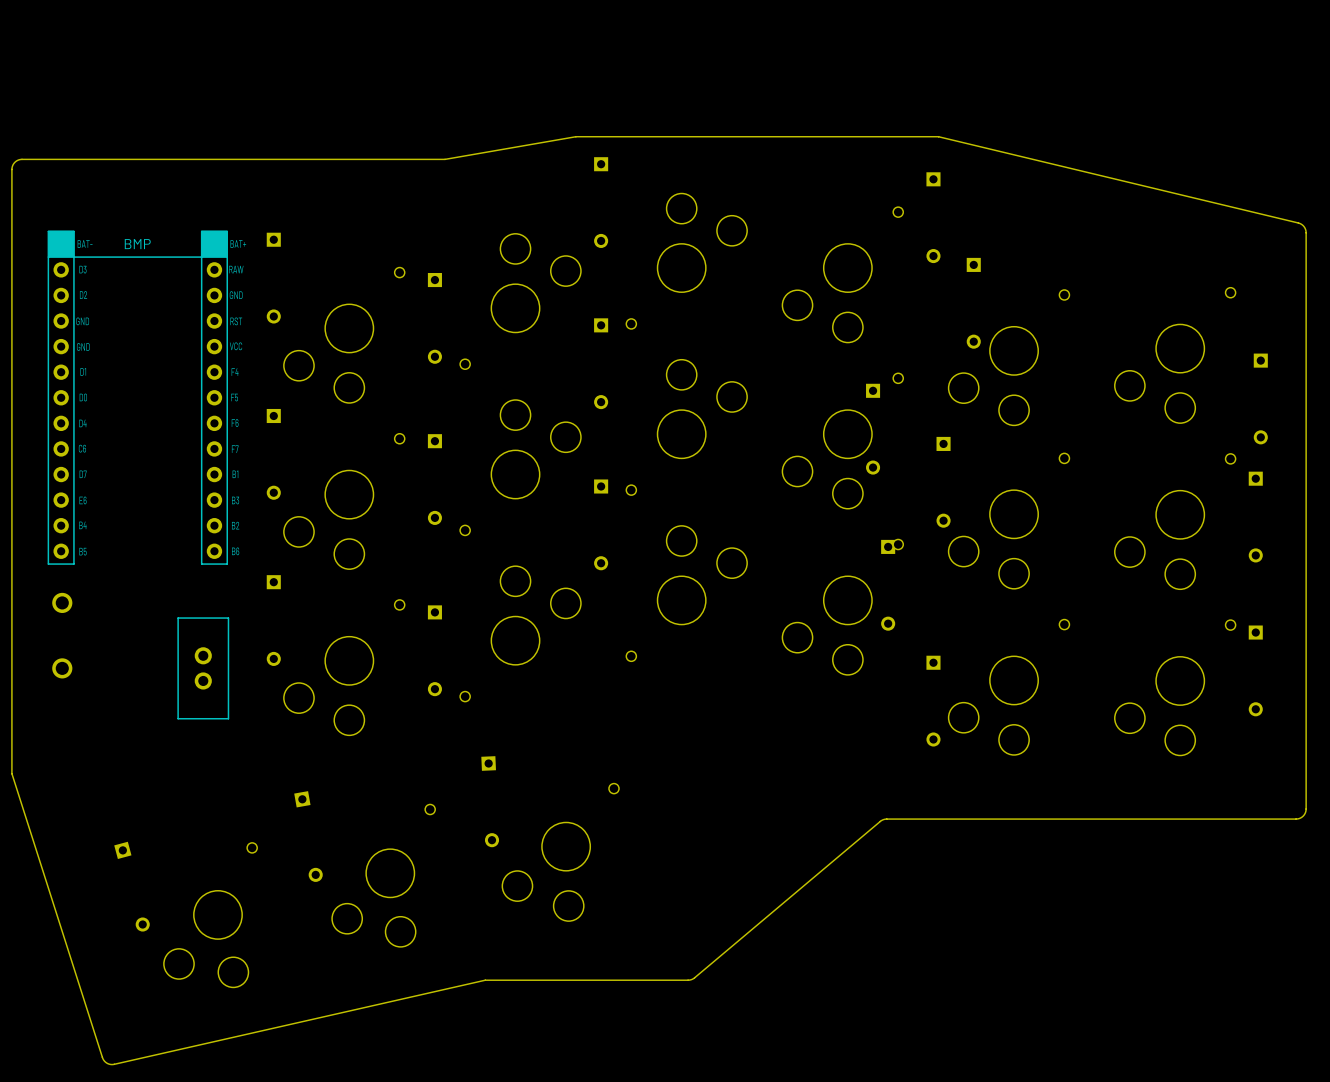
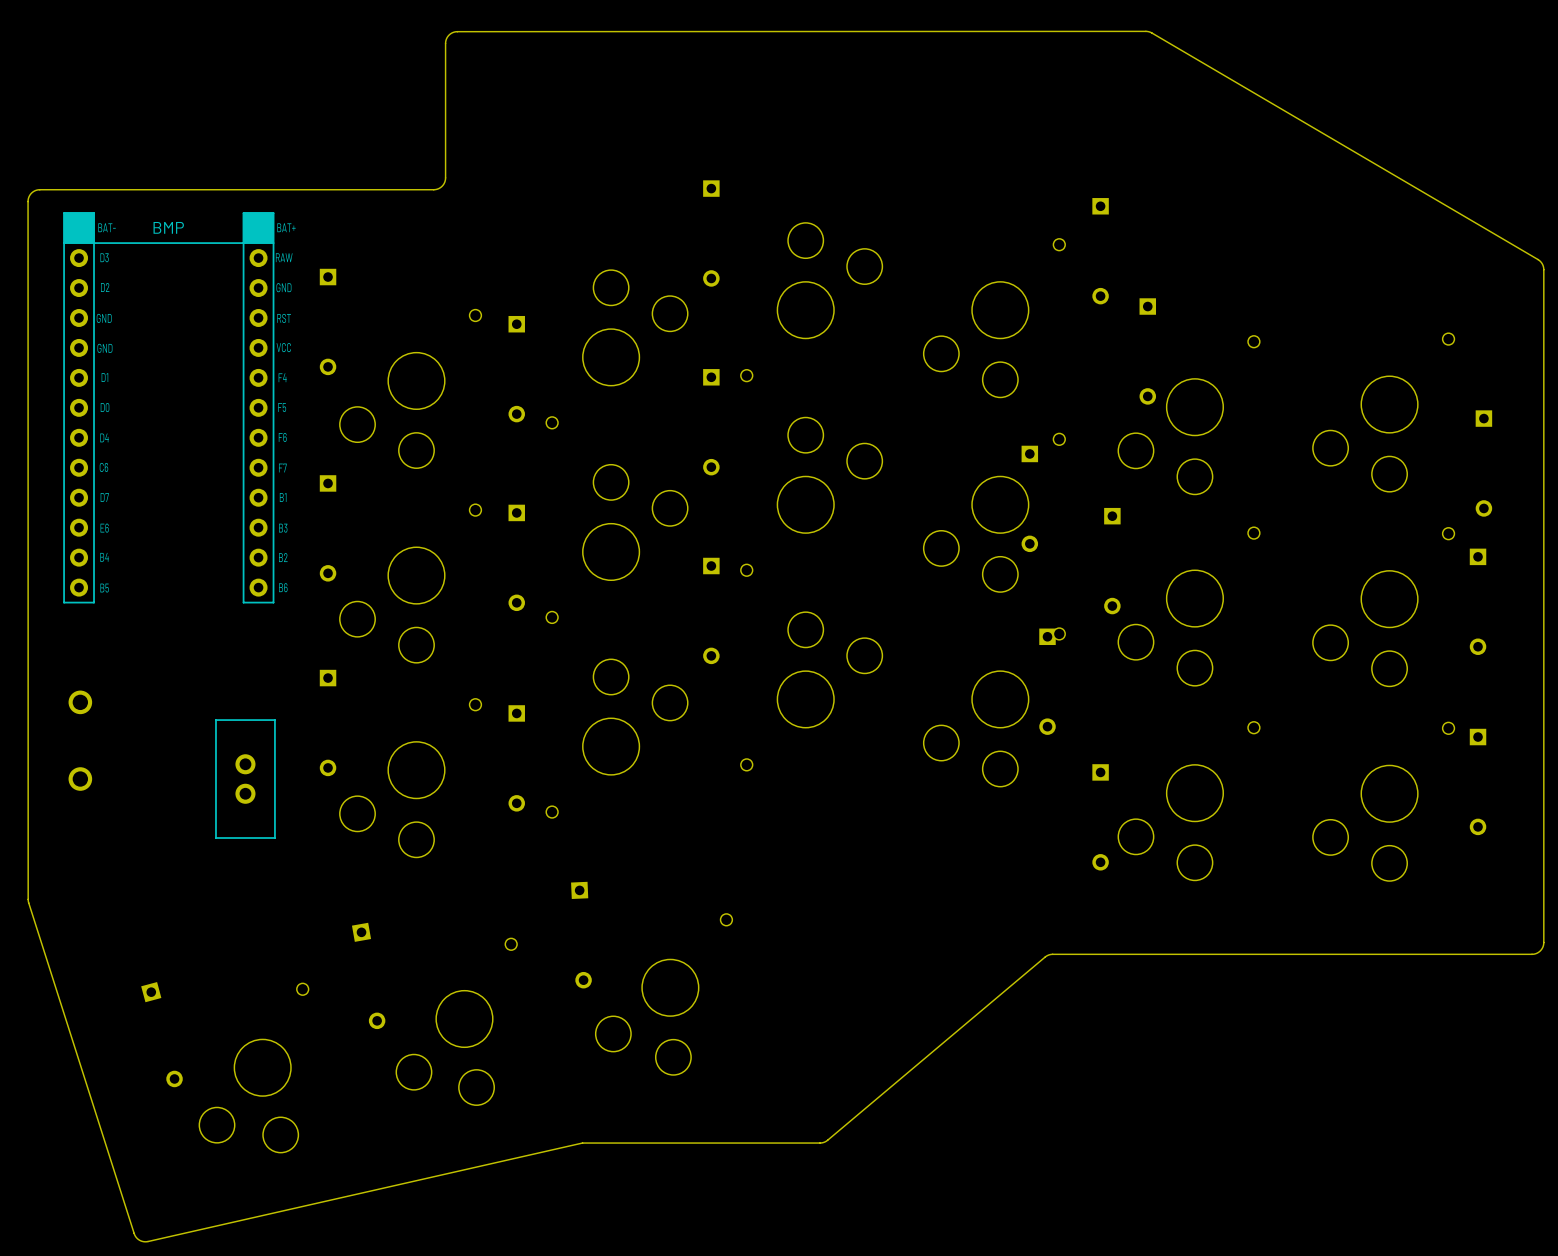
board edge: (575, 136) (445, 159) (22, 159) (13, 164) (11, 773) (102, 1057) (106, 1063) (114, 1064) (485, 980) (691, 979) (884, 819) (1296, 819) (1301, 817) (1305, 813) (1306, 232) (1303, 225) (938, 136) (575, 136) -> (1145, 31) (455, 31) (449, 35) (445, 41) (445, 177) (443, 185) (438, 188) (39, 189) (30, 194) (28, 201) (28, 900) (134, 1233) (138, 1239) (148, 1241) (582, 1143) (824, 1142) (1050, 954) (1532, 954) (1541, 949) (1543, 942) (1542, 265) (1537, 259) (1151, 33) (1145, 31)
part position: (137, 397) -> (168, 407)

